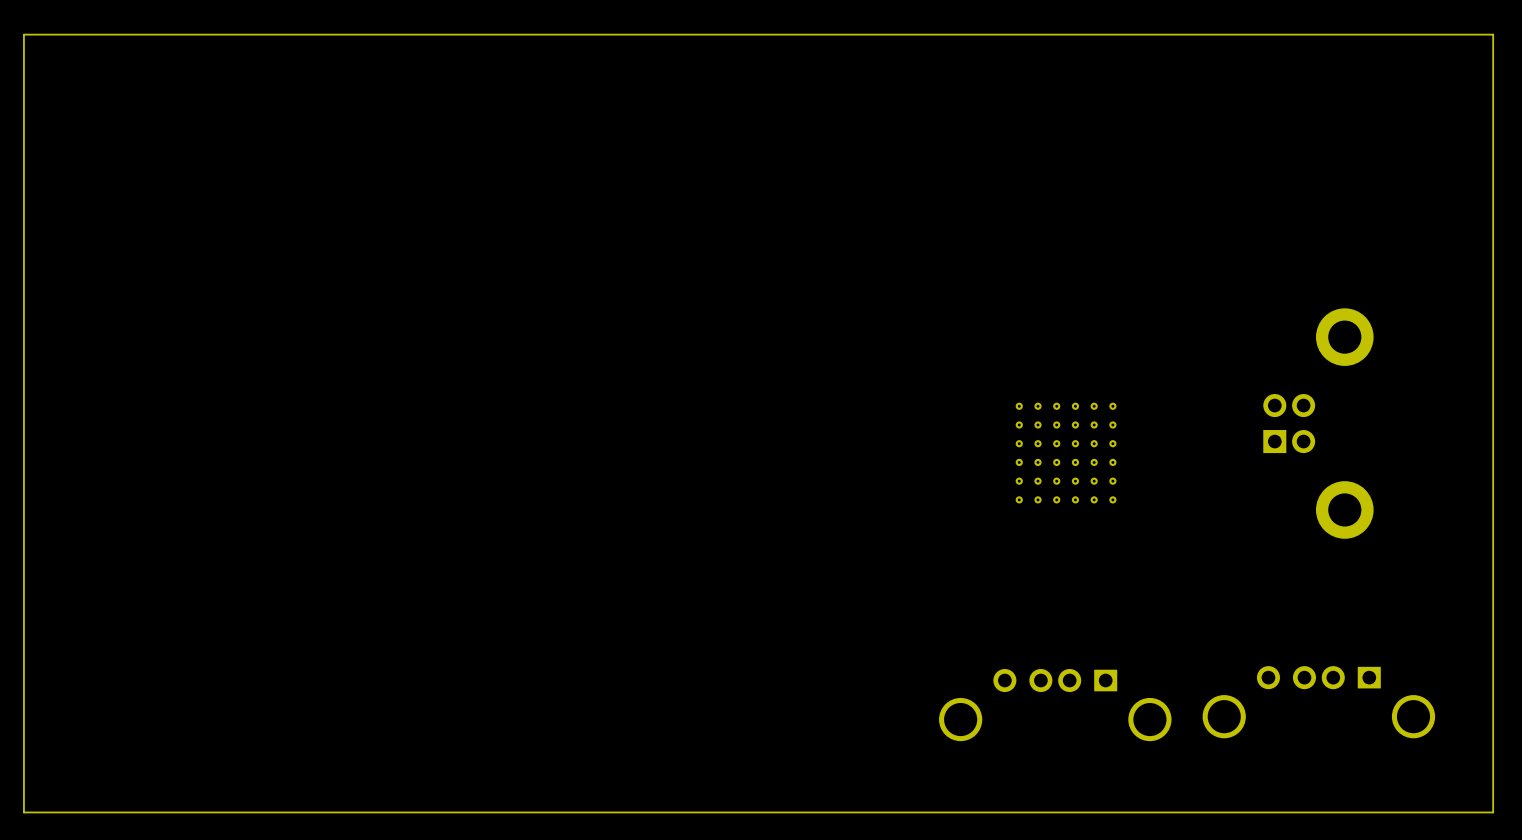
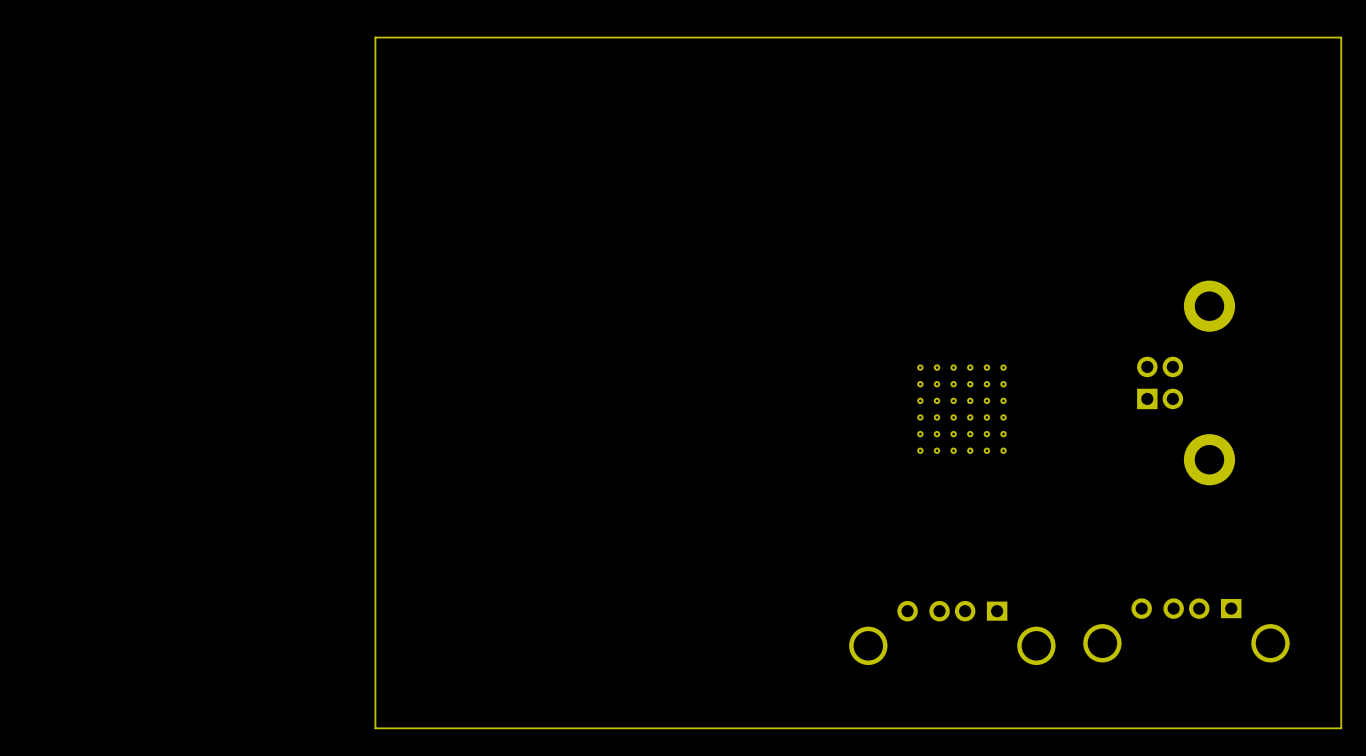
board edge: (405, 34) (23, 34) (23, 812) (405, 812) -> (375, 37) (375, 728)

